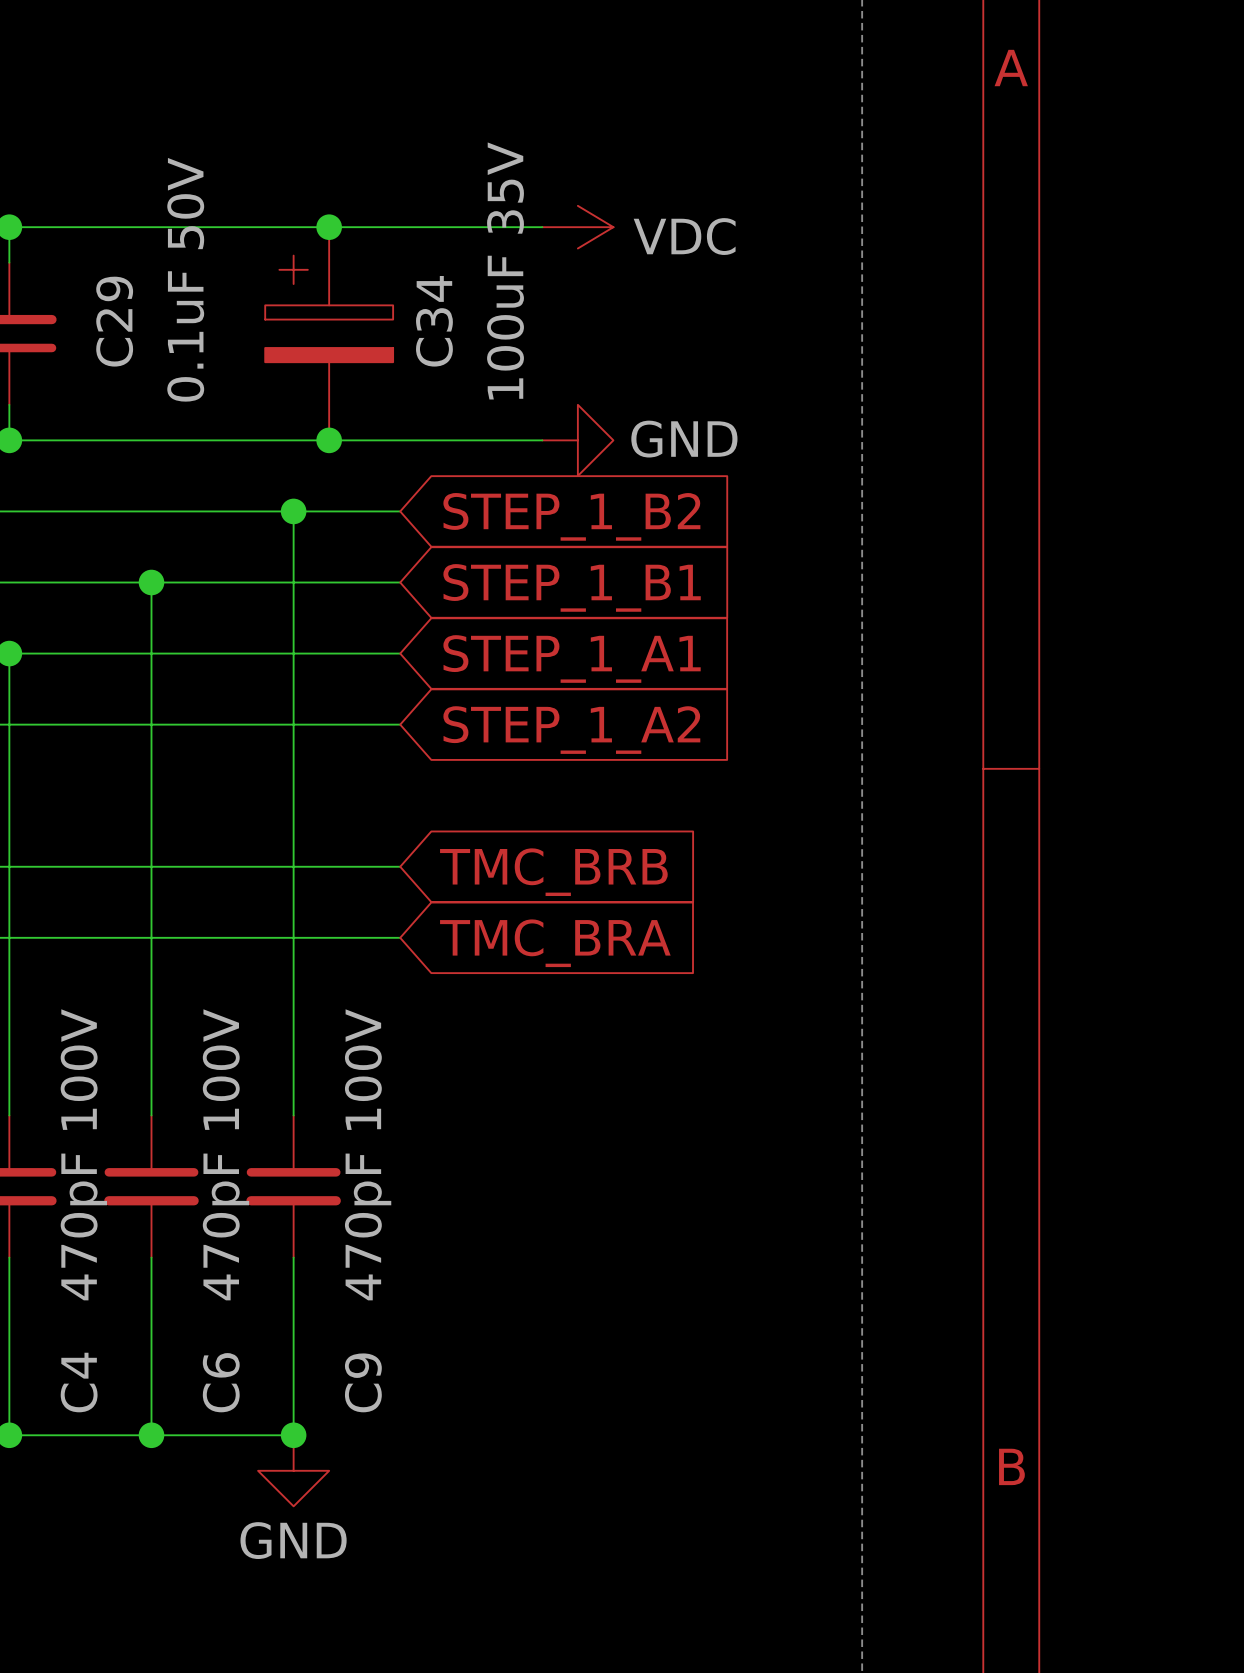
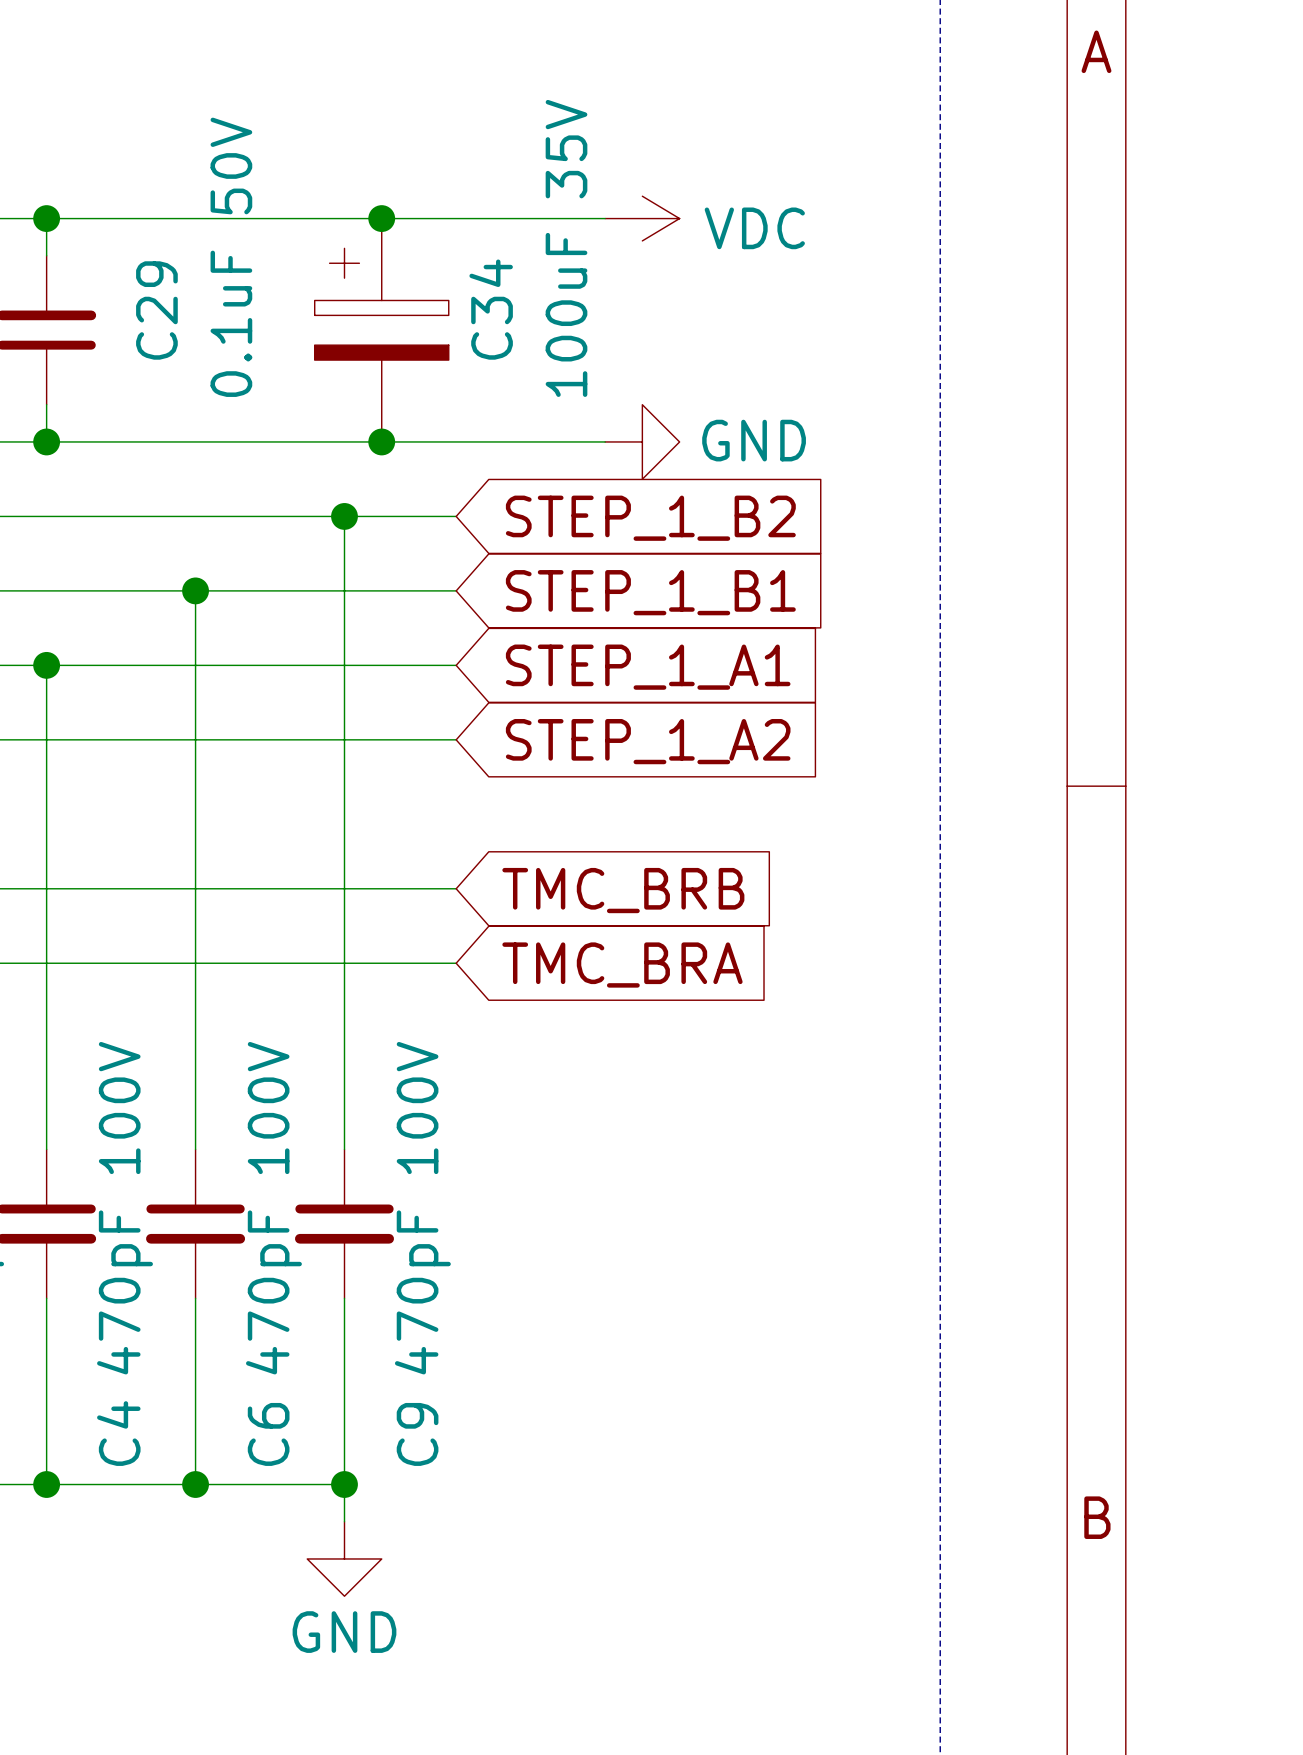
power symbol position: GND (293, 1470) -> GND (344, 1558)

